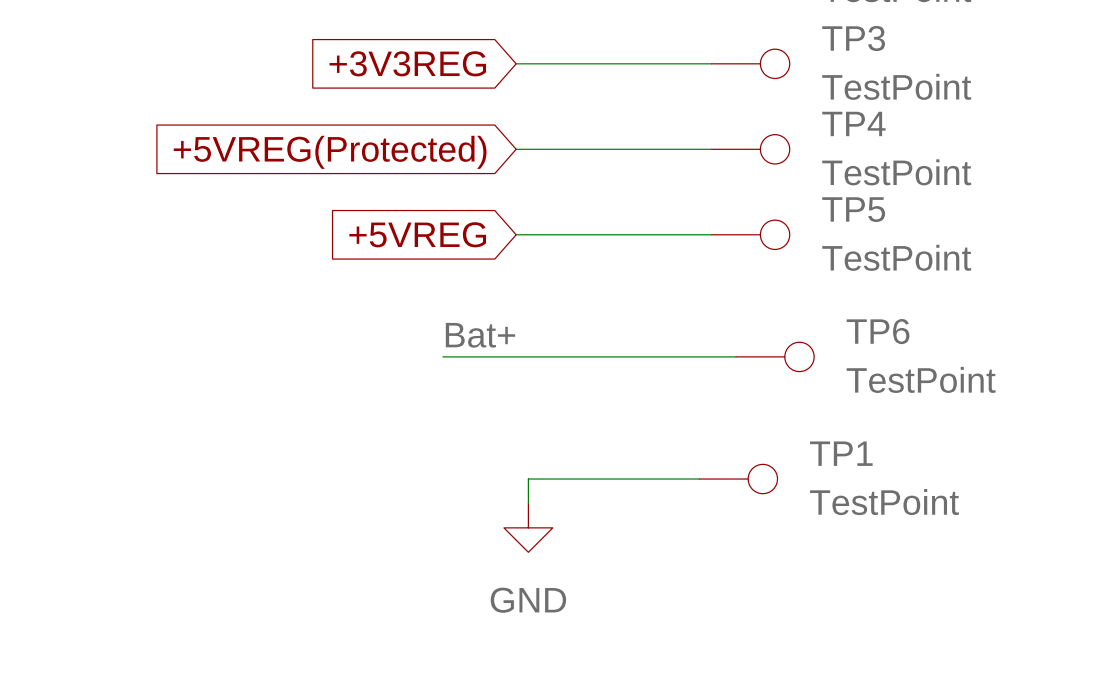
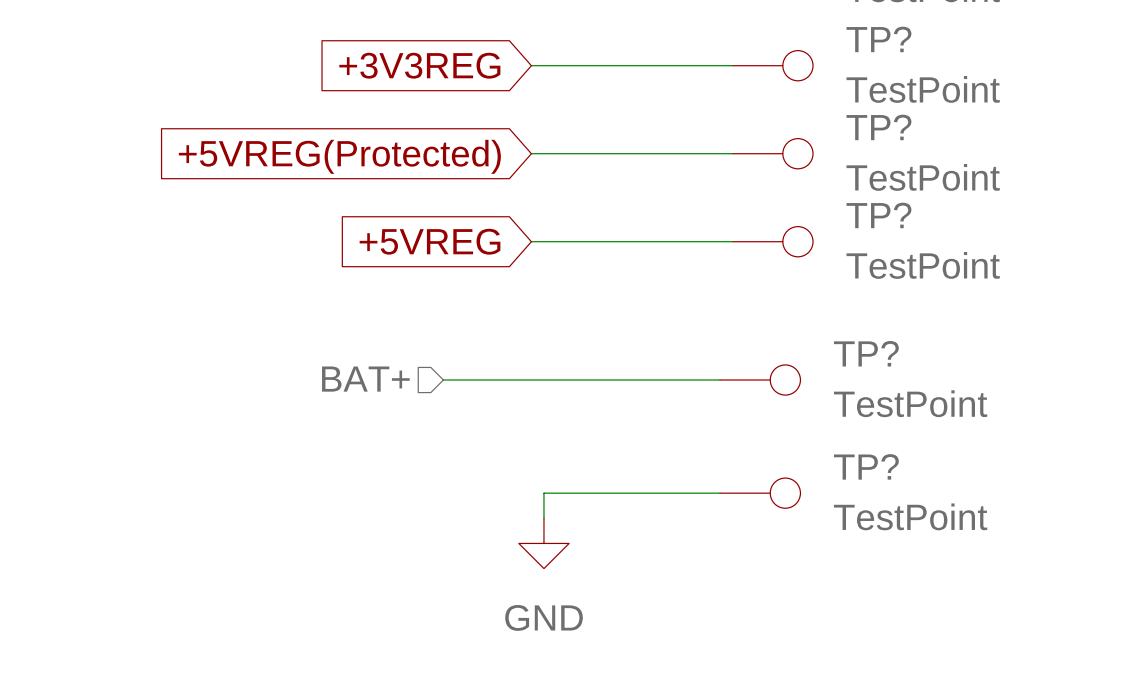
TP3 name: TP3 (853, 38) -> TP? (878, 39)
TP4 name: TP4 (853, 123) -> TP? (878, 127)
TP5 name: TP5 (853, 209) -> TP? (878, 215)
label: Bat+ (480, 335) -> none
wire: (442, 356) (735, 356) -> none
TP6: TestPoint (775, 356) -> none
hierarchical label: none -> BAT+ (365, 379)
wire: none -> (443, 380) (719, 380)
TP?: none -> TestPoint (760, 380)
TP1 name: TP1 (841, 453) -> TP? (866, 466)

